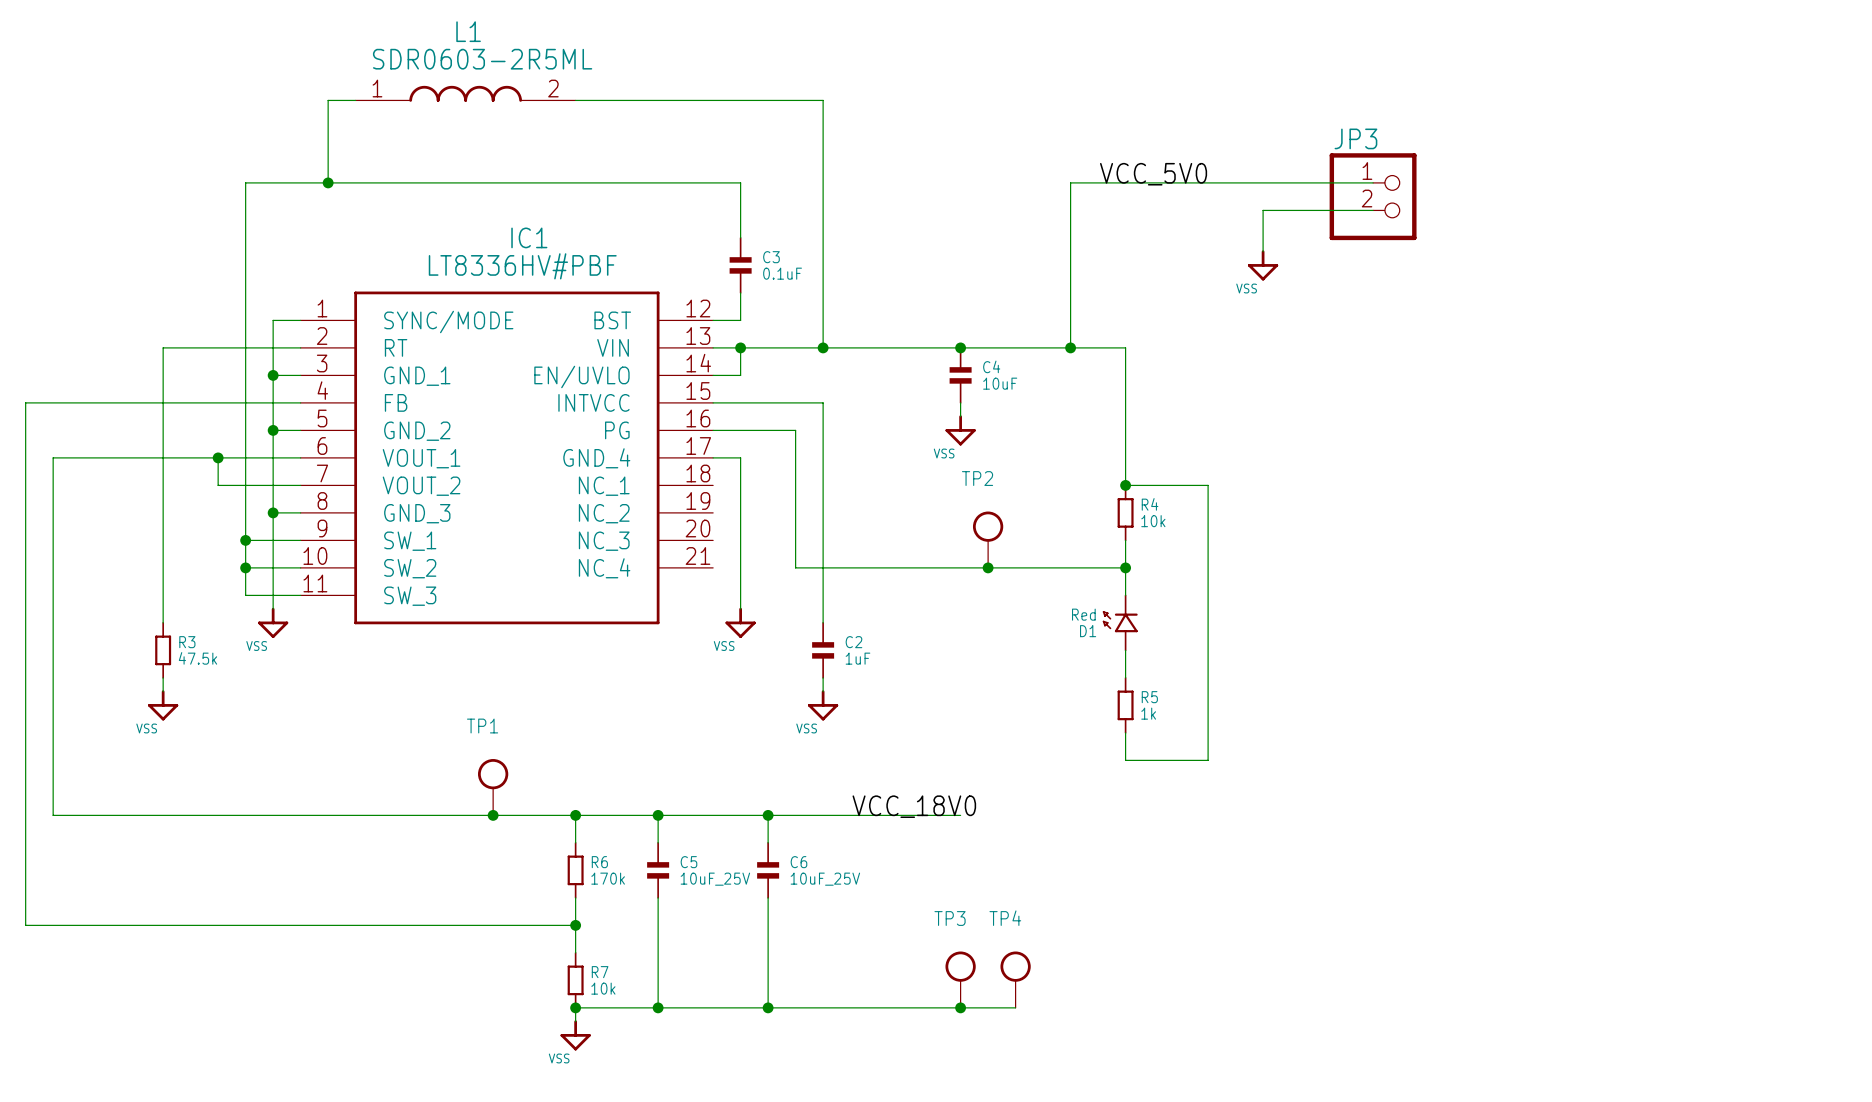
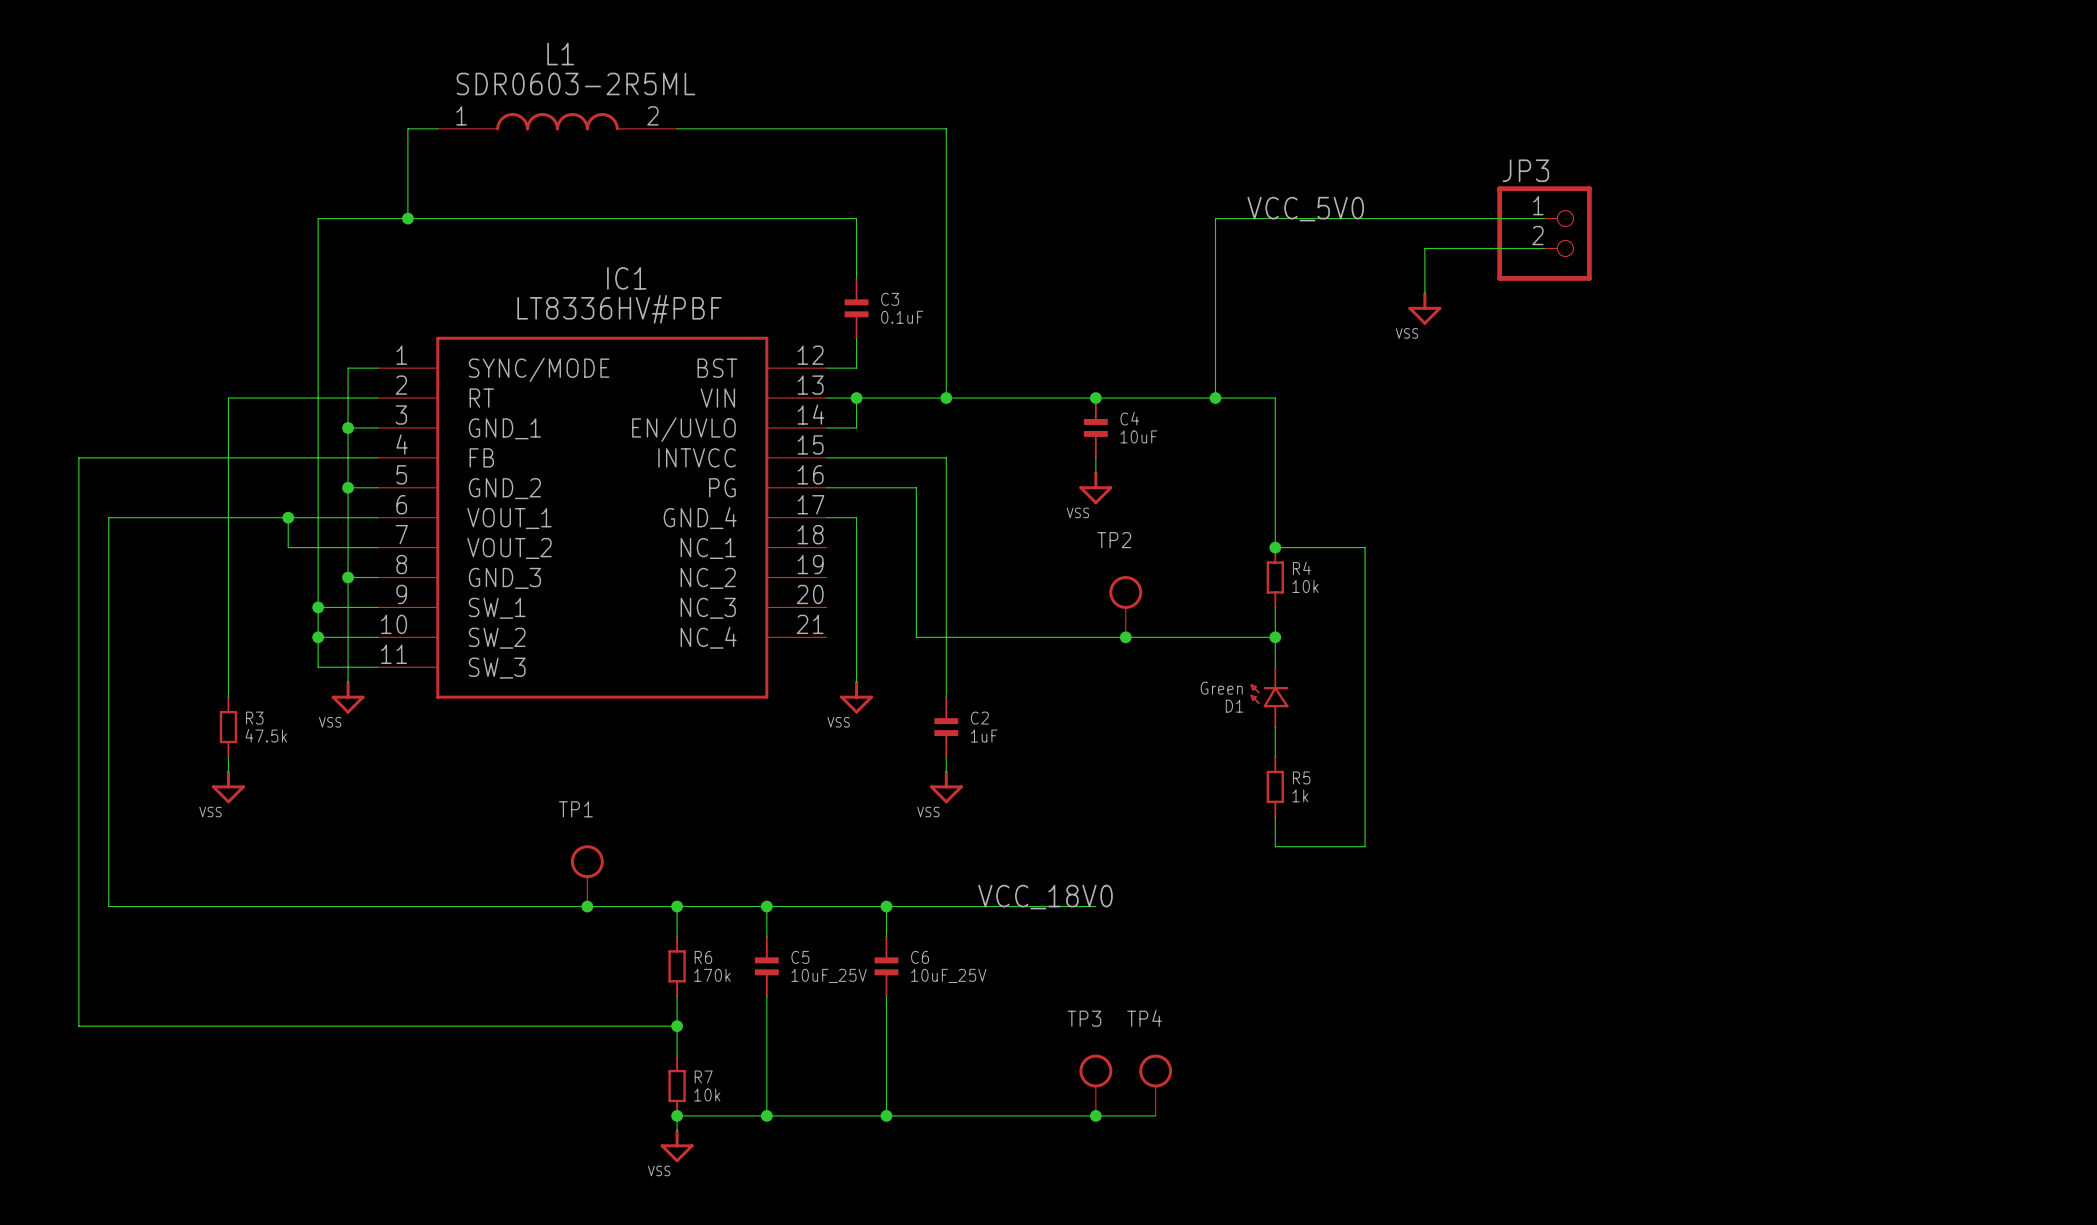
D1 value: Red (1083, 614) -> Green (1221, 688)

